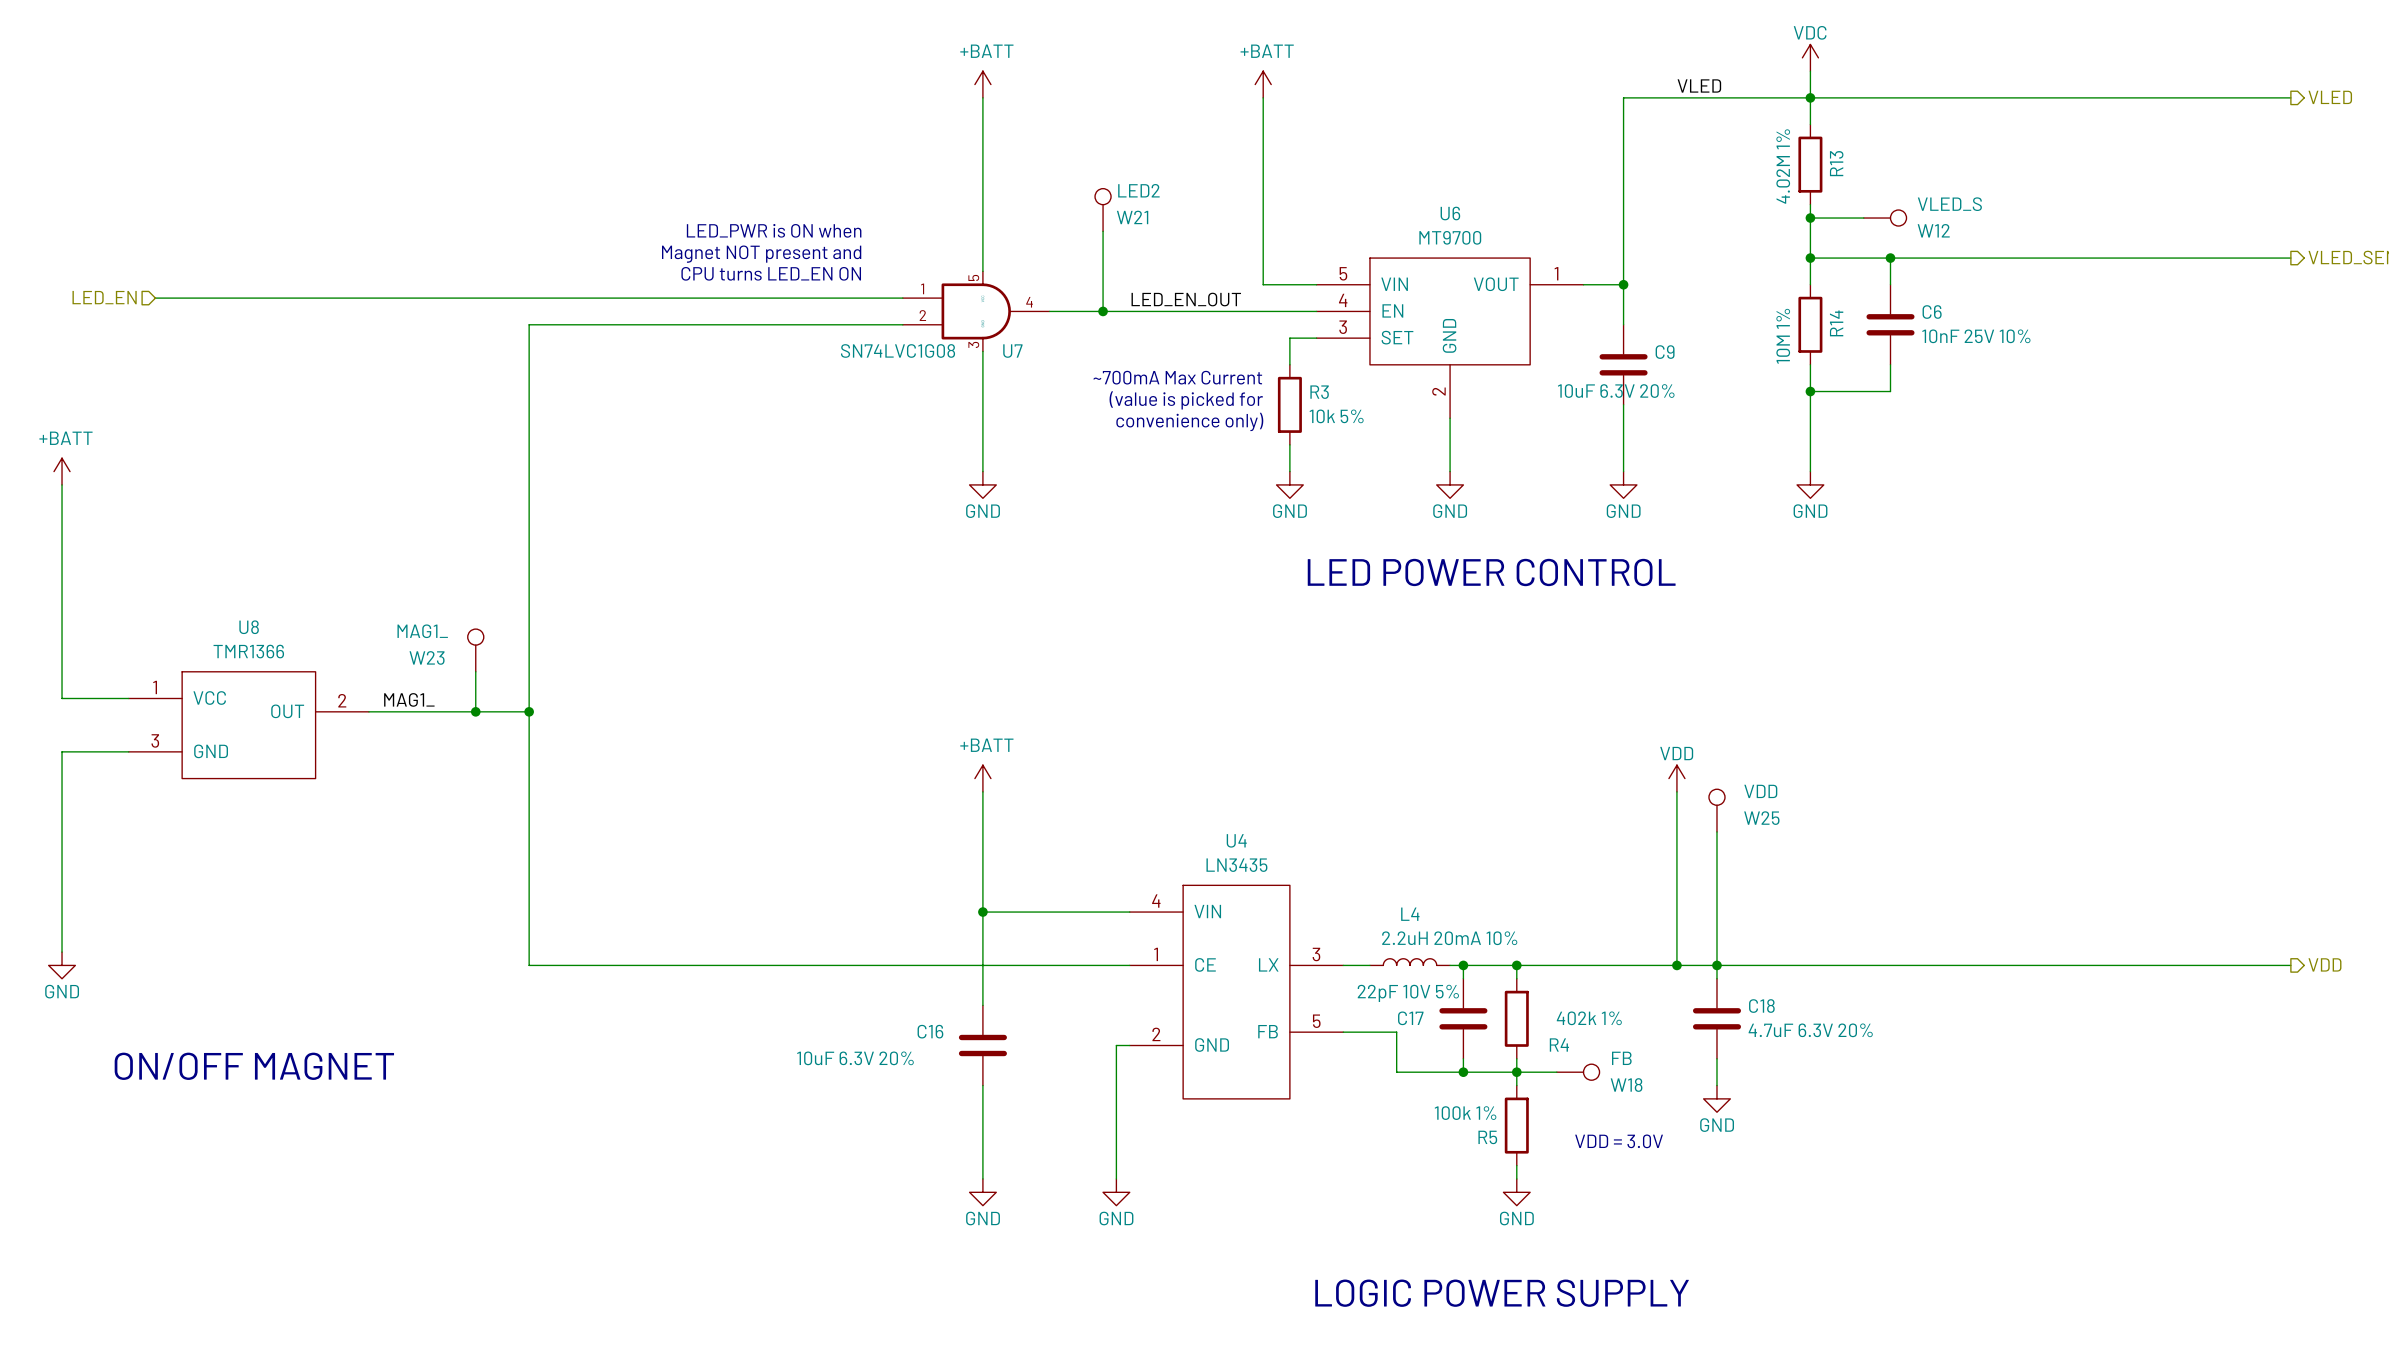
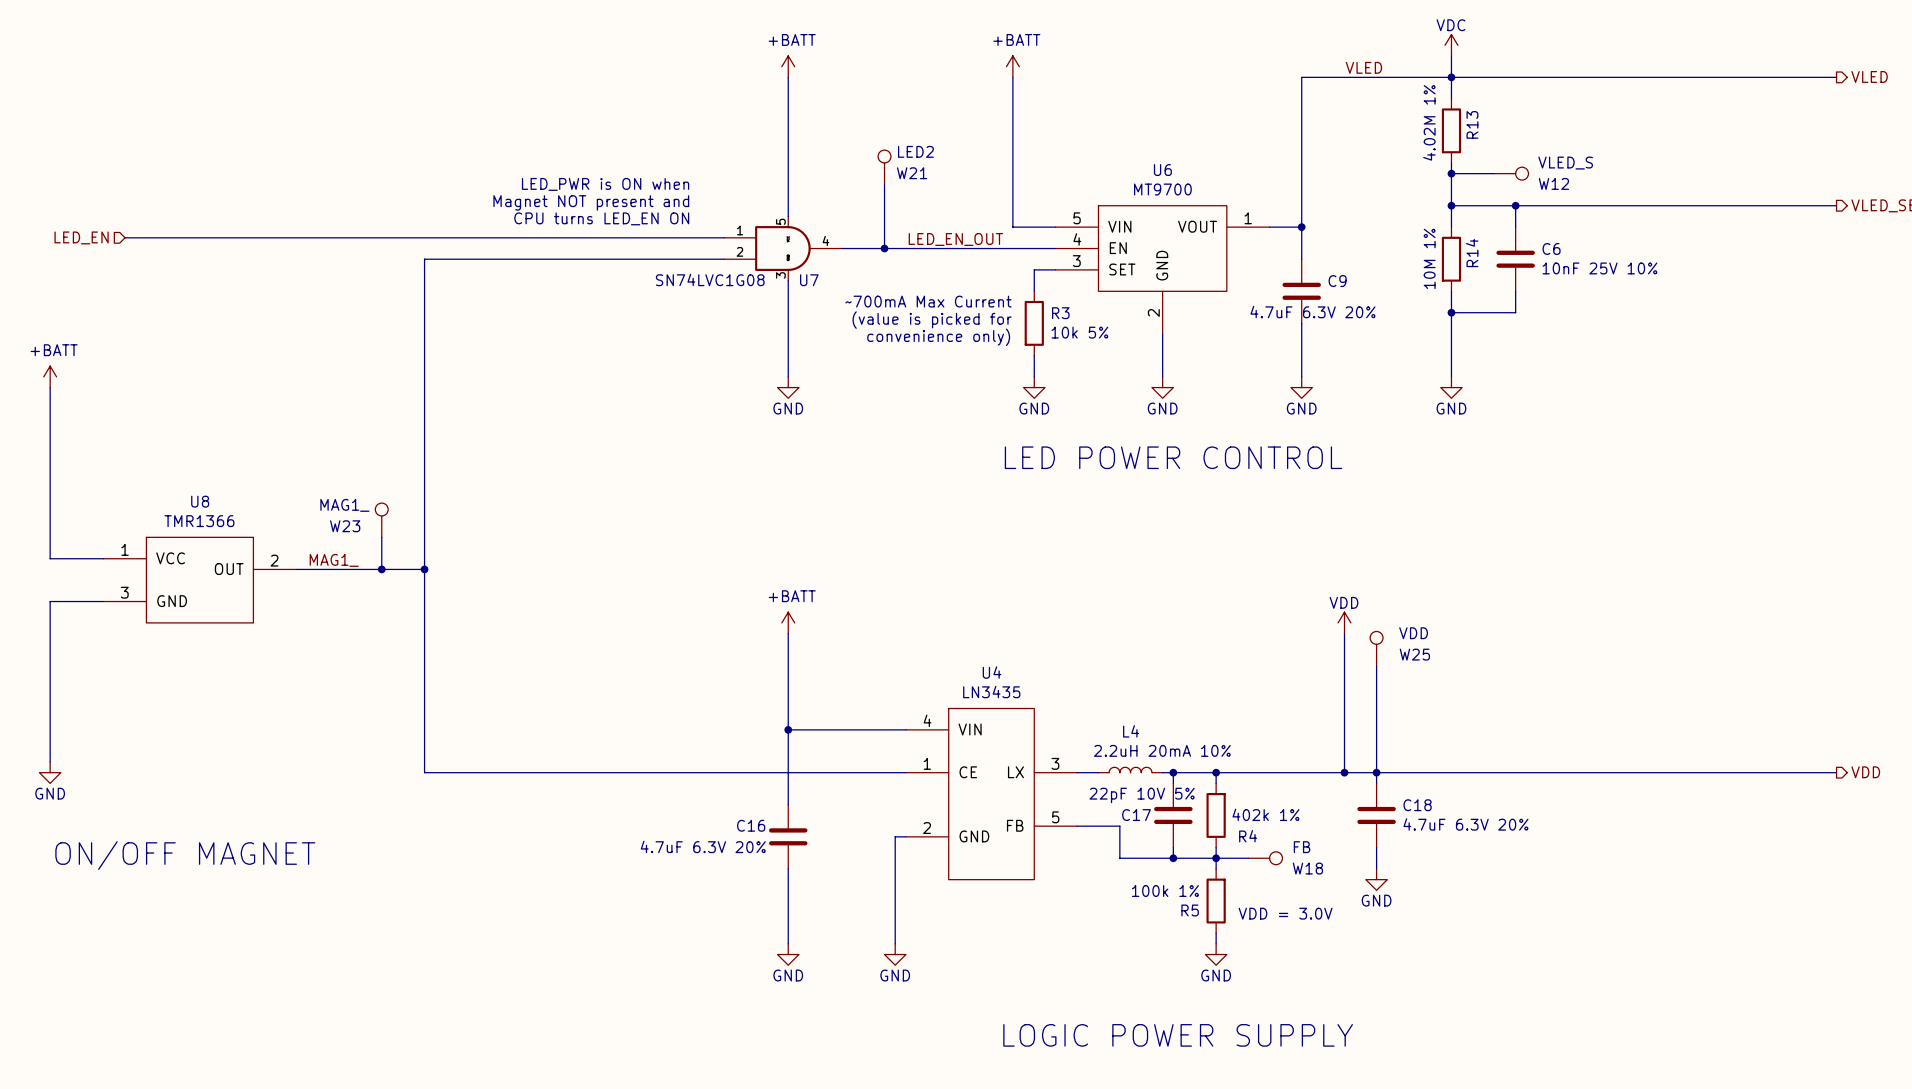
C9 value: 10uF 6.3V 20% (1616, 391) -> 4.7uF 6.3V 20% (1312, 312)
C16 value: 10uF 6.3V 20% (855, 1058) -> 4.7uF 6.3V 20% (703, 846)

